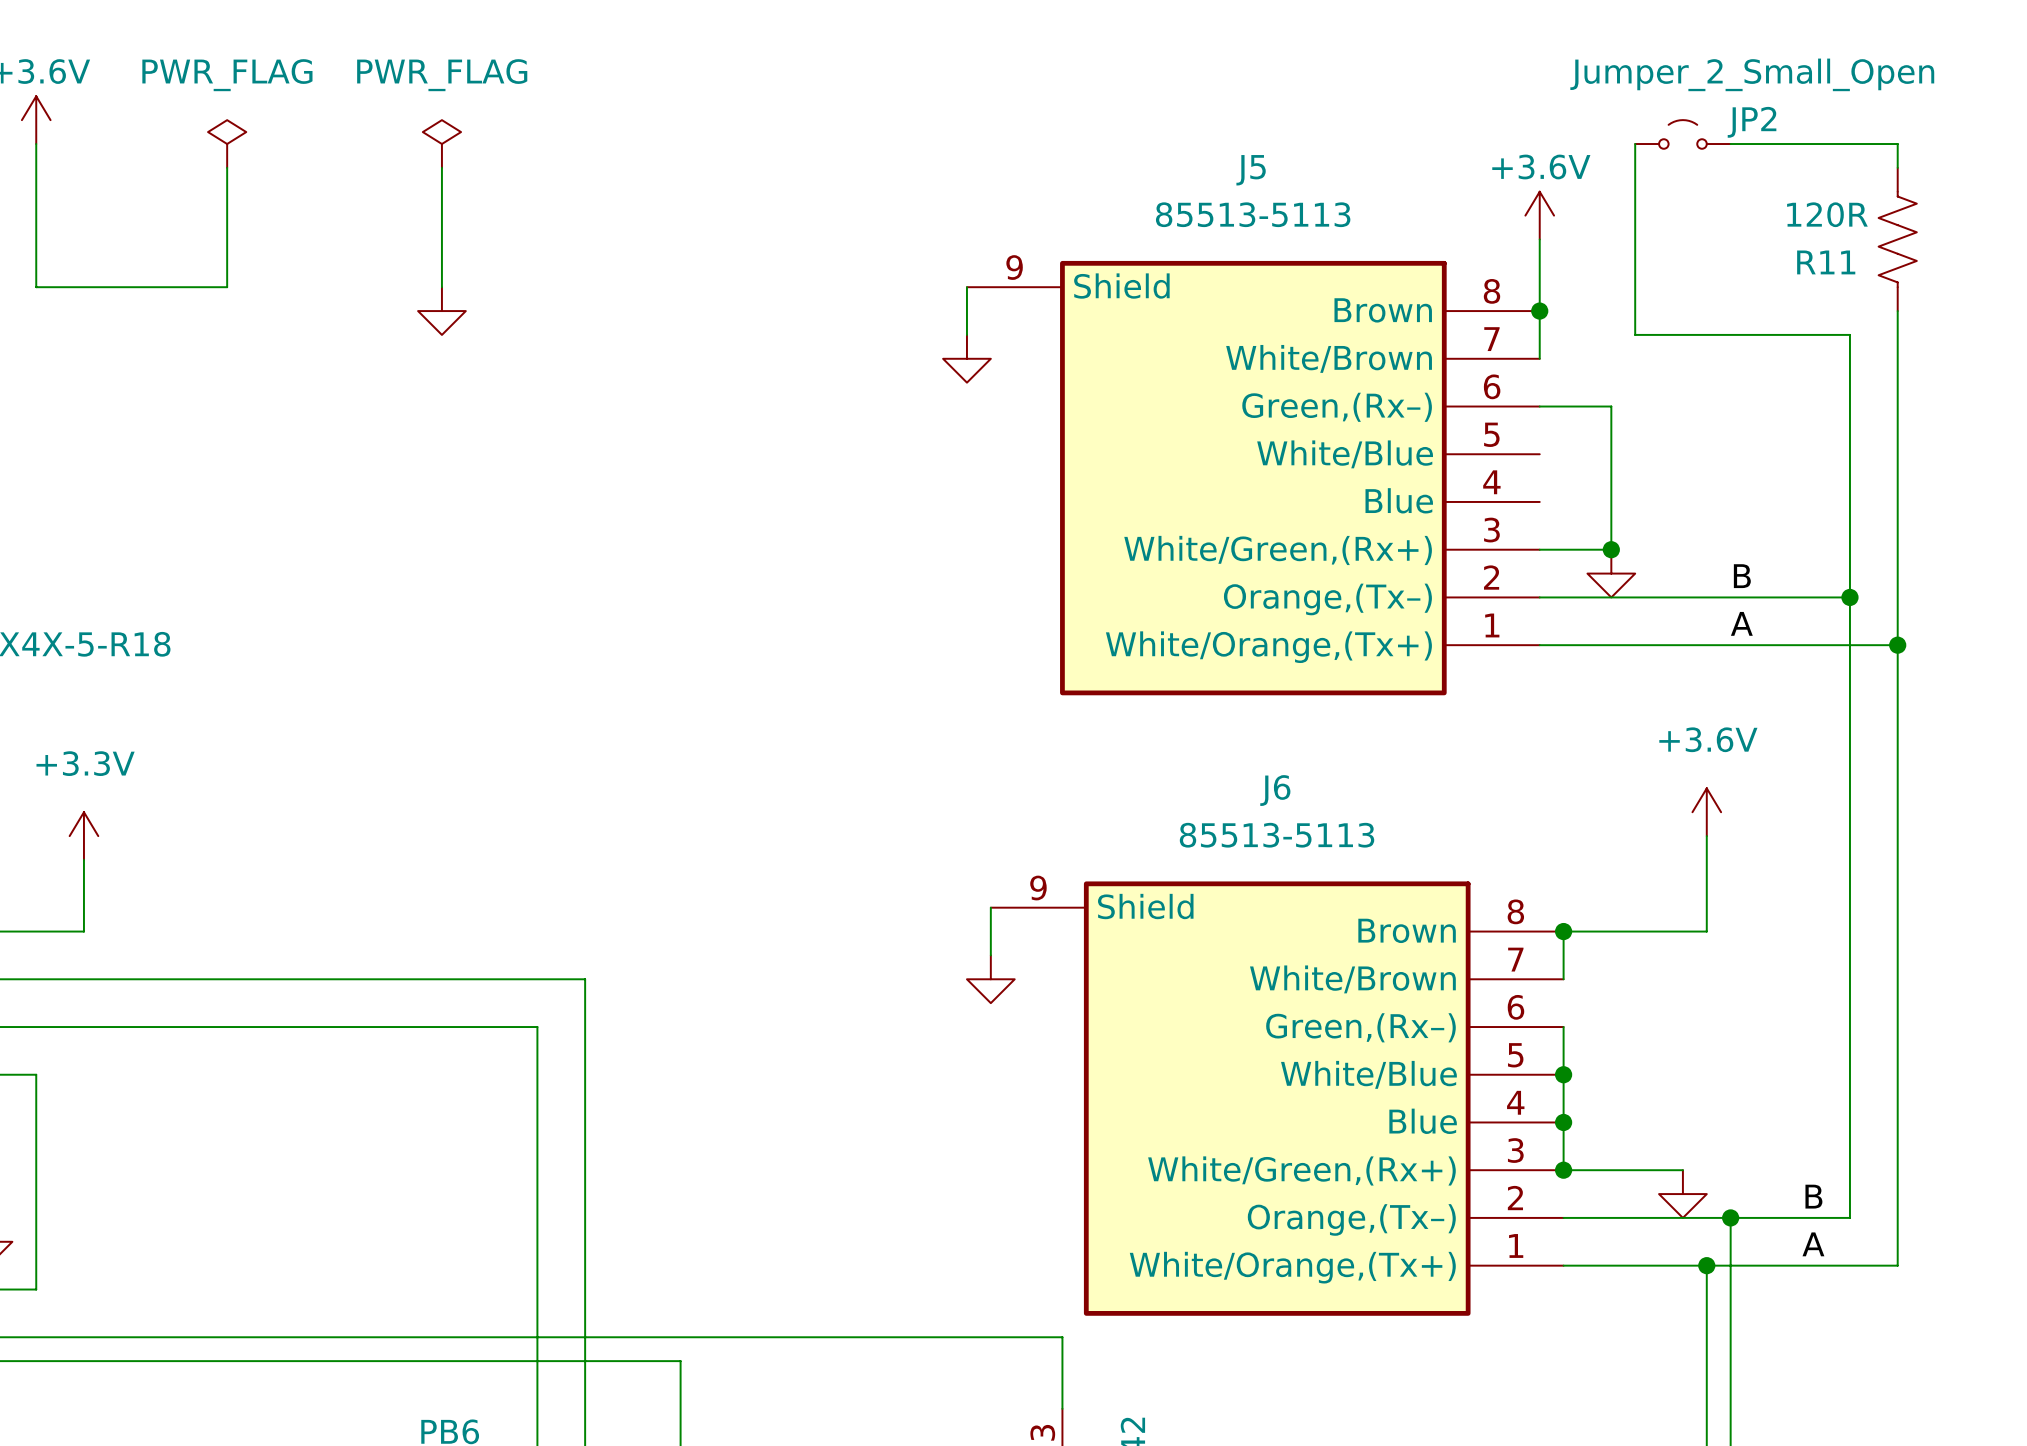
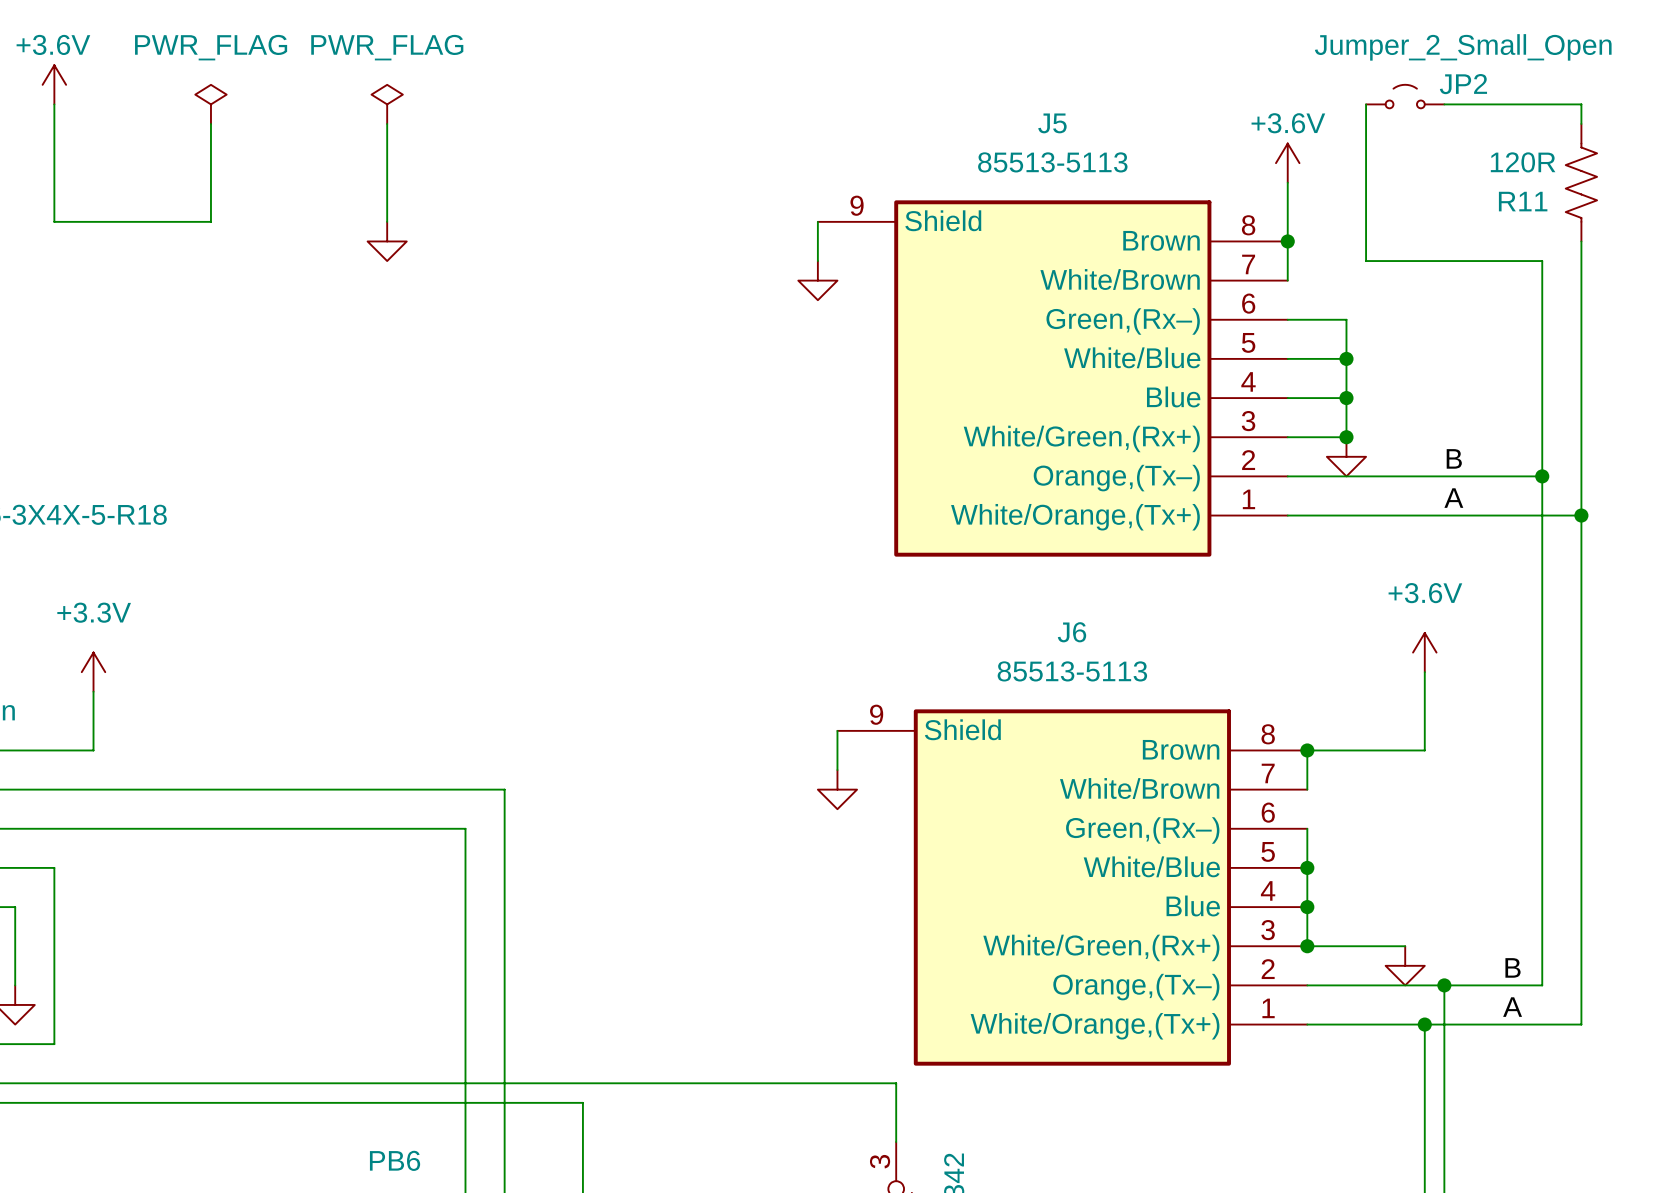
wire: none -> (1287, 358) (1346, 358)
junction: none -> (1346, 358)
wire: none -> (1287, 398) (1346, 398)
junction: none -> (1346, 398)

